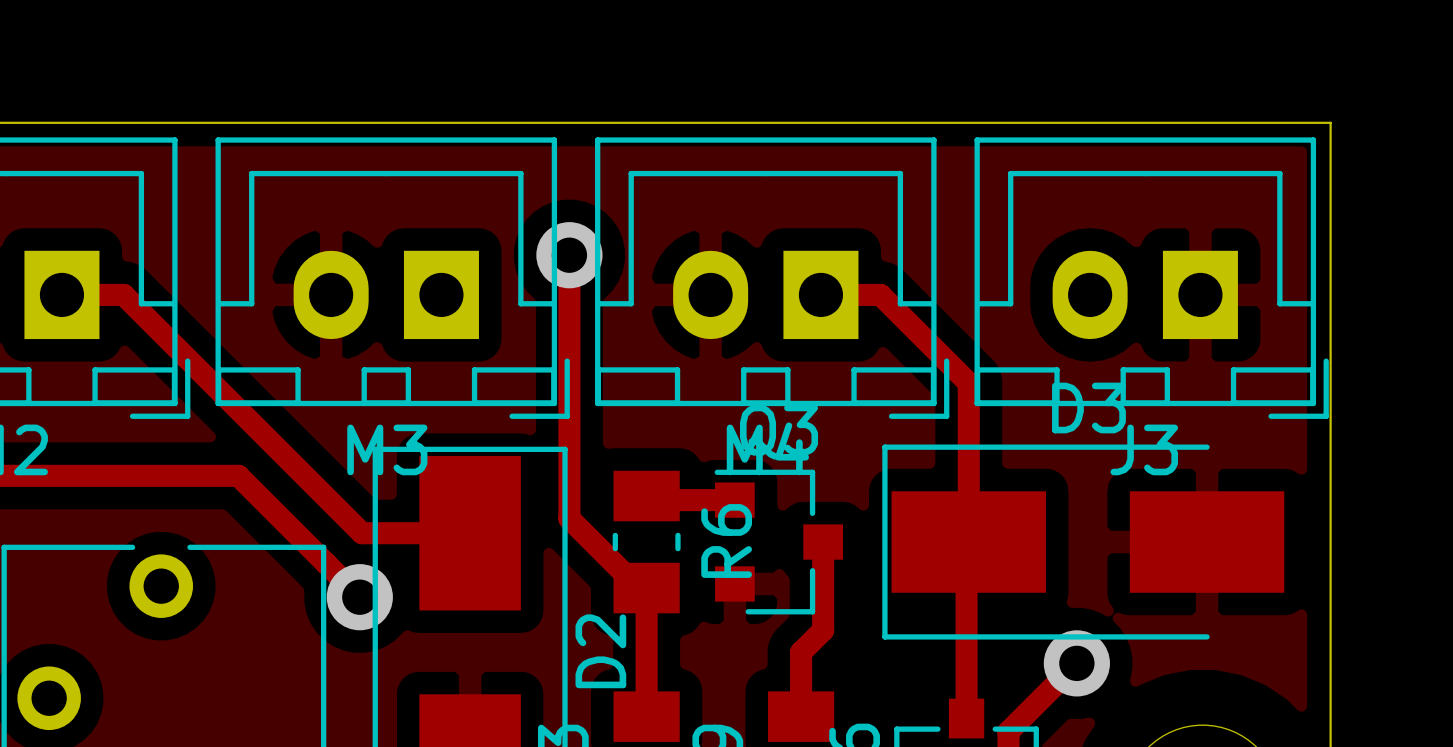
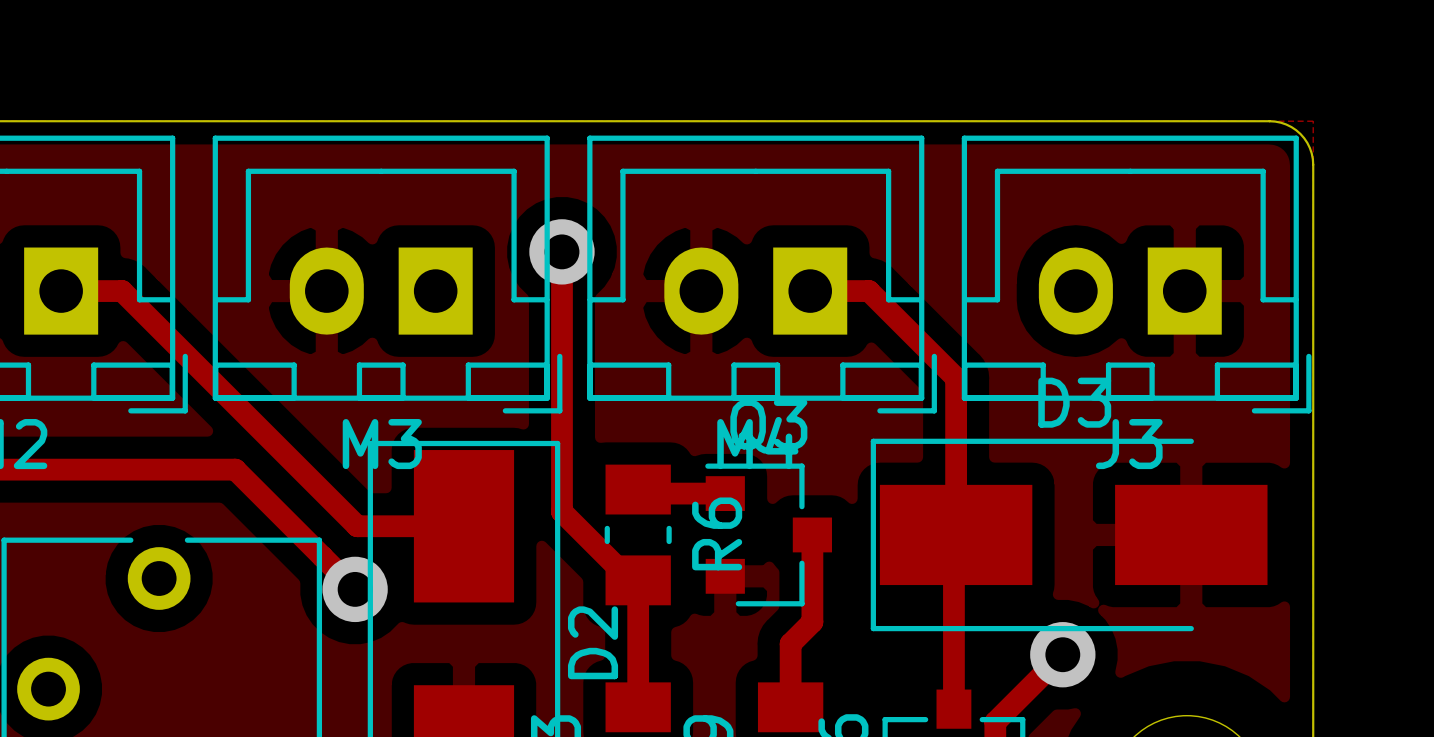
board edge: (1286, 122) (1330, 122) (1330, 166) -> (1269, 121) (1286, 124) (1300, 133) (1309, 148) (1313, 164)

